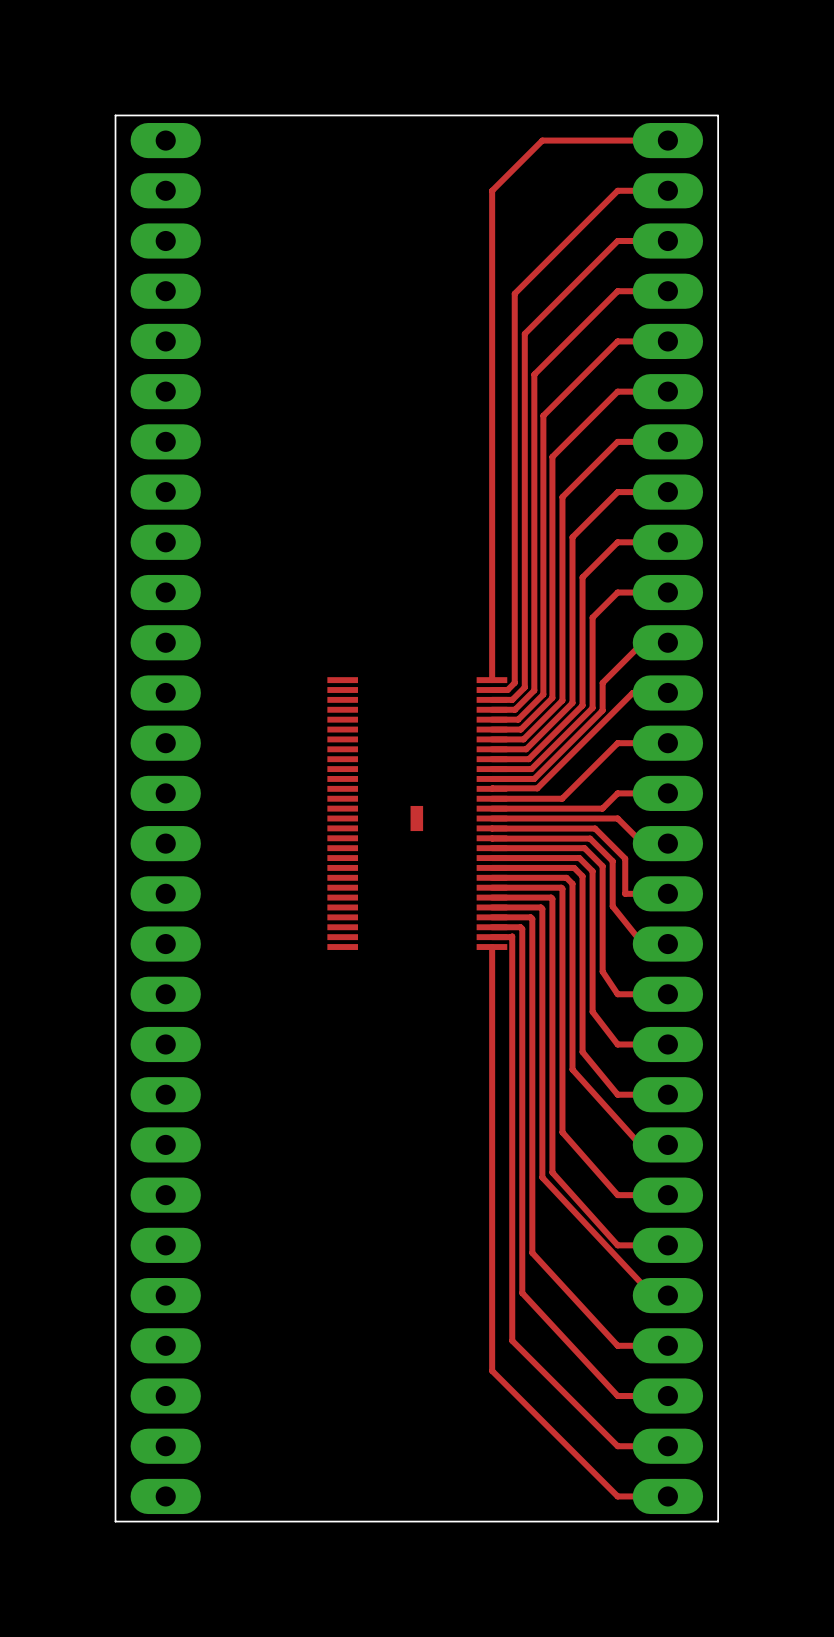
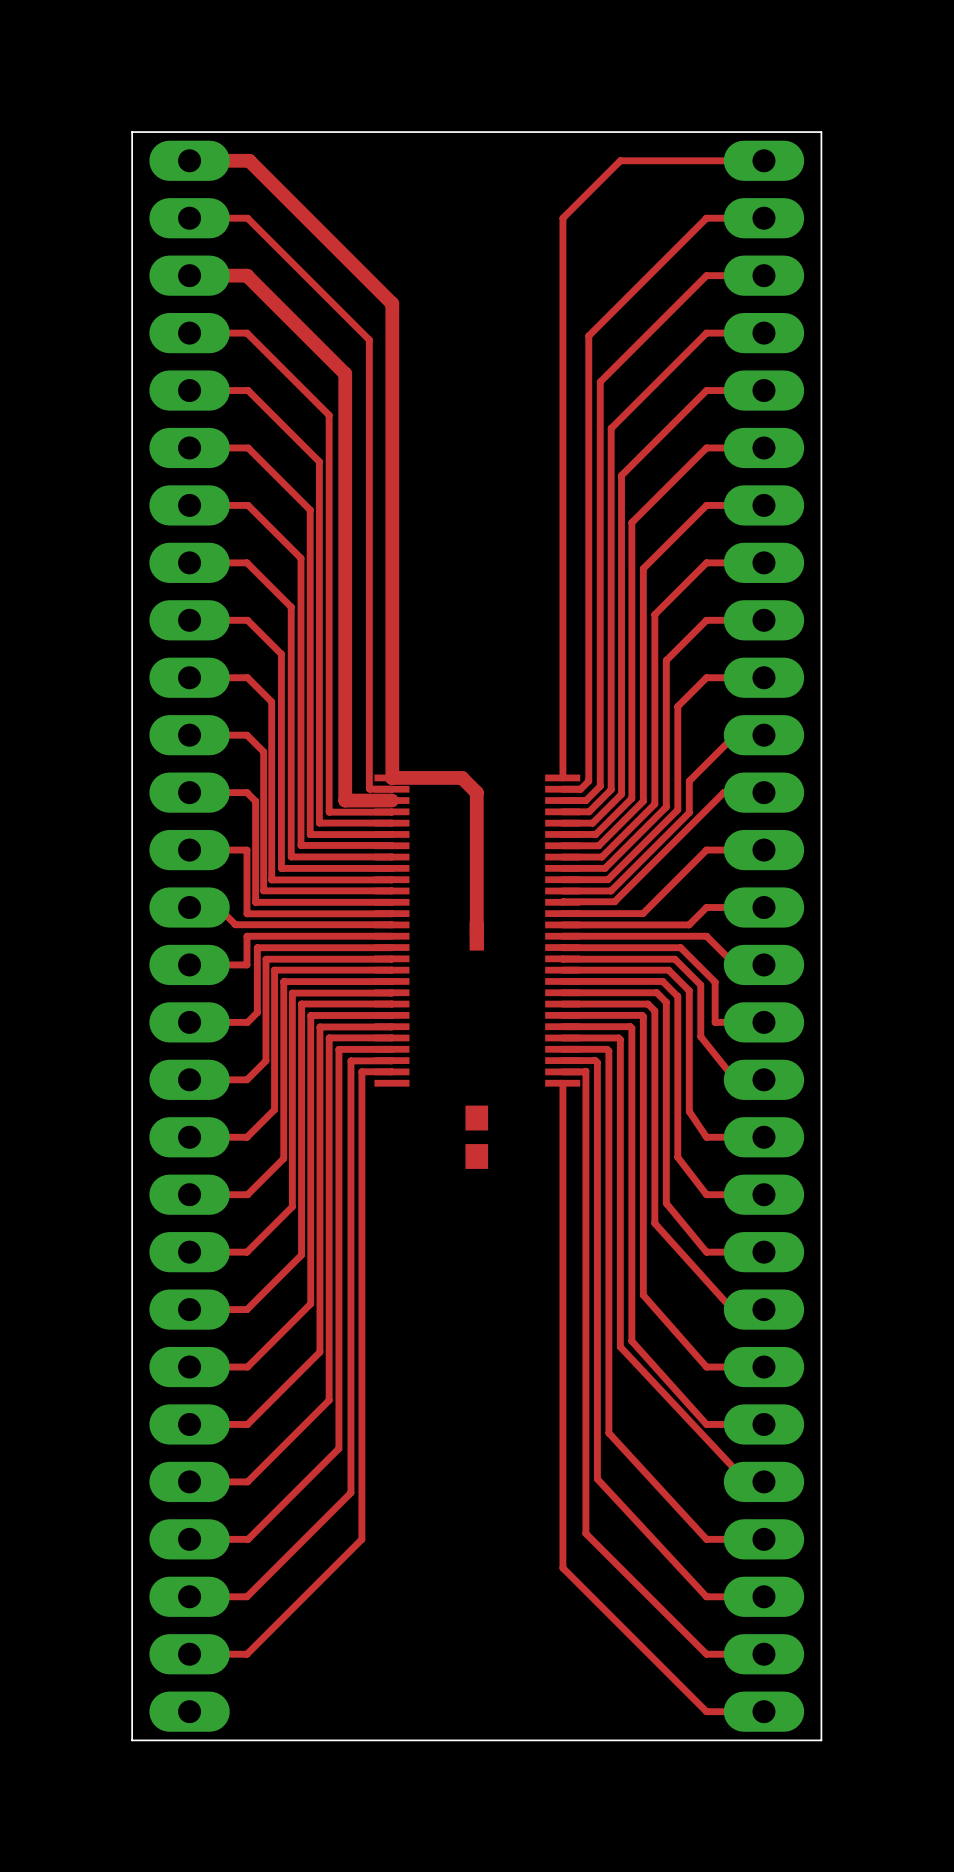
top track: none -> (189, 160) (249, 160) (392, 303) (391, 777) (462, 777) (476, 792) (476, 936)
top track: none -> (189, 218) (247, 218) (369, 339) (369, 788) (391, 789)
top track: none -> (189, 275) (247, 275) (345, 373) (345, 800) (391, 800)
top track: none -> (189, 333) (247, 333) (329, 415) (329, 812) (391, 812)
top track: none -> (189, 390) (248, 390) (319, 461) (319, 823) (391, 823)
top track: none -> (189, 447) (248, 447) (310, 510) (310, 834) (391, 834)
top track: none -> (189, 505) (248, 505) (301, 558) (301, 845) (391, 845)
top track: none -> (189, 562) (247, 562) (291, 607) (291, 856) (391, 856)
top track: none -> (189, 620) (247, 620) (281, 654) (281, 868) (391, 868)
top track: none -> (189, 677) (247, 677) (271, 701) (271, 879) (391, 879)
top track: none -> (189, 735) (247, 735) (263, 751) (263, 890) (391, 890)
top track: none -> (189, 792) (247, 792) (255, 801) (255, 902) (391, 902)
top track: none -> (189, 850) (247, 850) (247, 913) (391, 913)
top track: none -> (189, 907) (218, 907) (235, 924) (391, 924)
top track: none -> (391, 936) (247, 936) (247, 964) (189, 964)
top track: none -> (391, 947) (257, 947) (257, 1012) (247, 1022) (189, 1022)
top track: none -> (391, 958) (265, 959) (265, 1060) (247, 1079) (189, 1079)
top track: none -> (391, 970) (274, 970) (274, 1109) (247, 1137) (189, 1137)
top track: none -> (391, 981) (283, 981) (283, 1158) (247, 1194) (189, 1194)
top track: none -> (391, 992) (292, 993) (292, 1206) (247, 1252) (189, 1252)
top track: none -> (391, 1004) (301, 1004) (301, 1255) (247, 1309) (189, 1309)
top track: none -> (391, 1015) (310, 1015) (310, 1303) (247, 1367) (189, 1367)
top track: none -> (391, 1026) (319, 1026) (319, 1352) (247, 1424) (189, 1424)
top track: none -> (391, 1037) (329, 1037) (329, 1400) (247, 1481) (189, 1481)
top track: none -> (391, 1049) (338, 1049) (338, 1448) (248, 1539) (189, 1539)
top track: none -> (391, 1060) (350, 1060) (350, 1492) (247, 1596) (189, 1596)
top track: none -> (391, 1071) (361, 1071) (361, 1539) (247, 1654) (189, 1654)
part: none -> (476, 1137)

